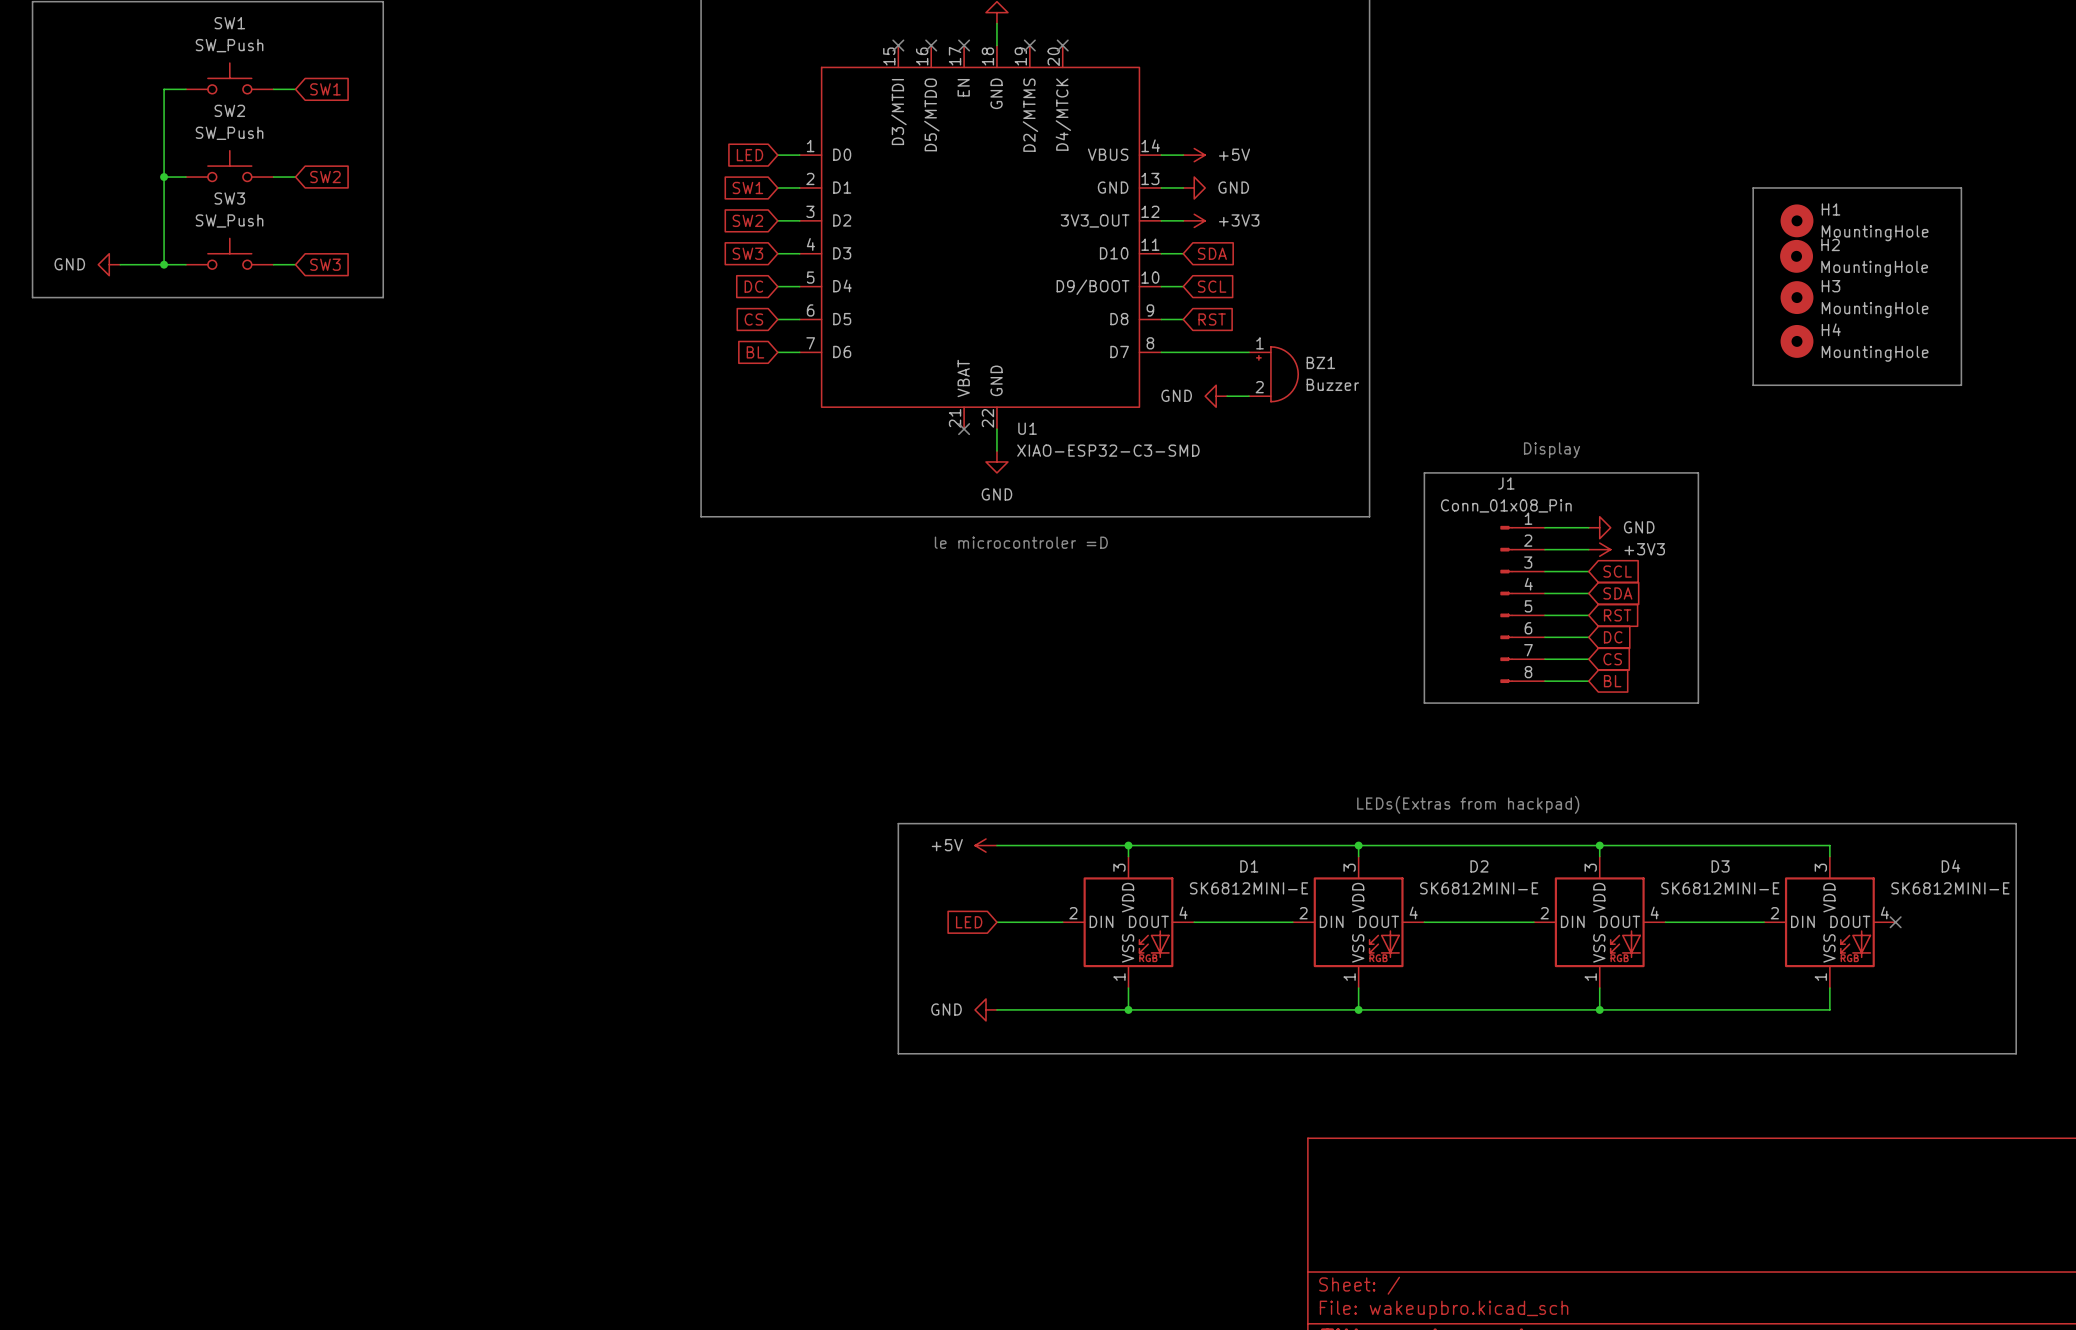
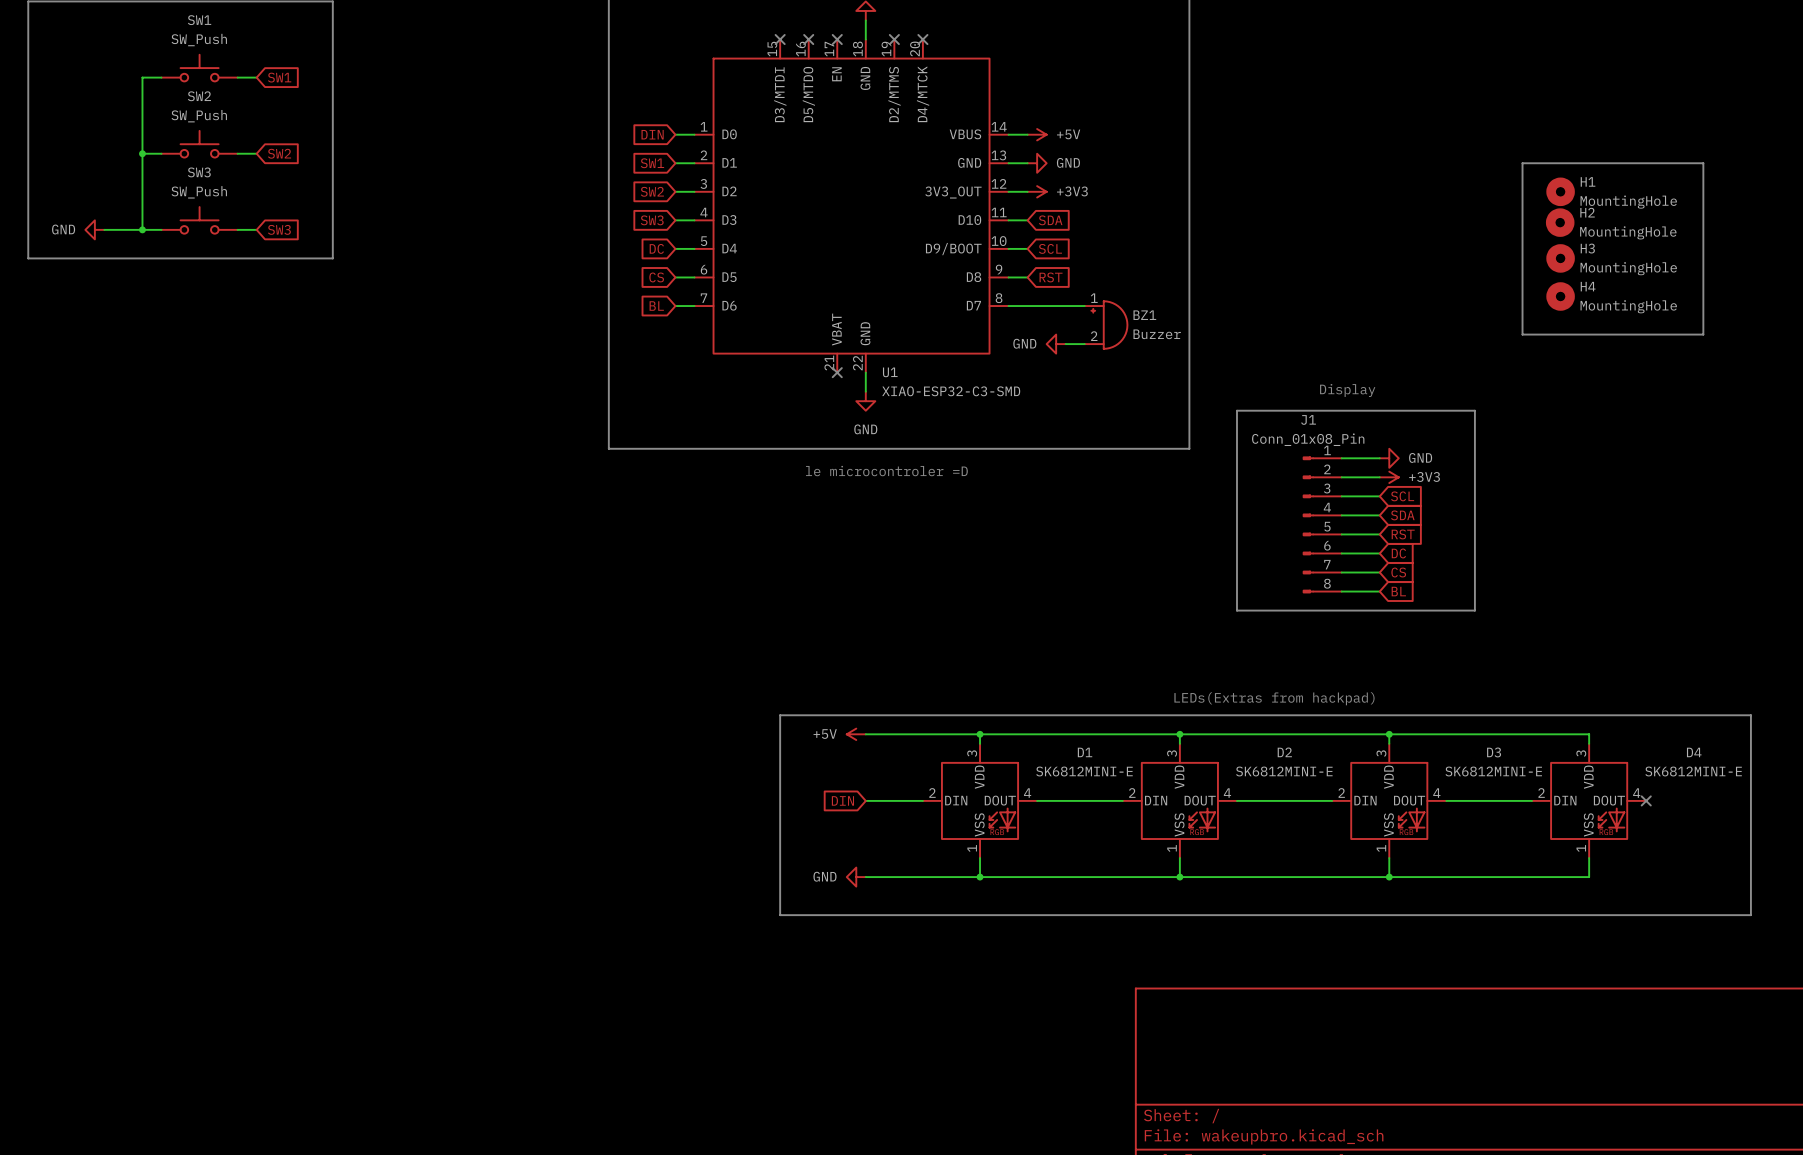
global label: LED (749, 155) -> DIN (652, 134)
global label: LED (969, 922) -> DIN (842, 800)

